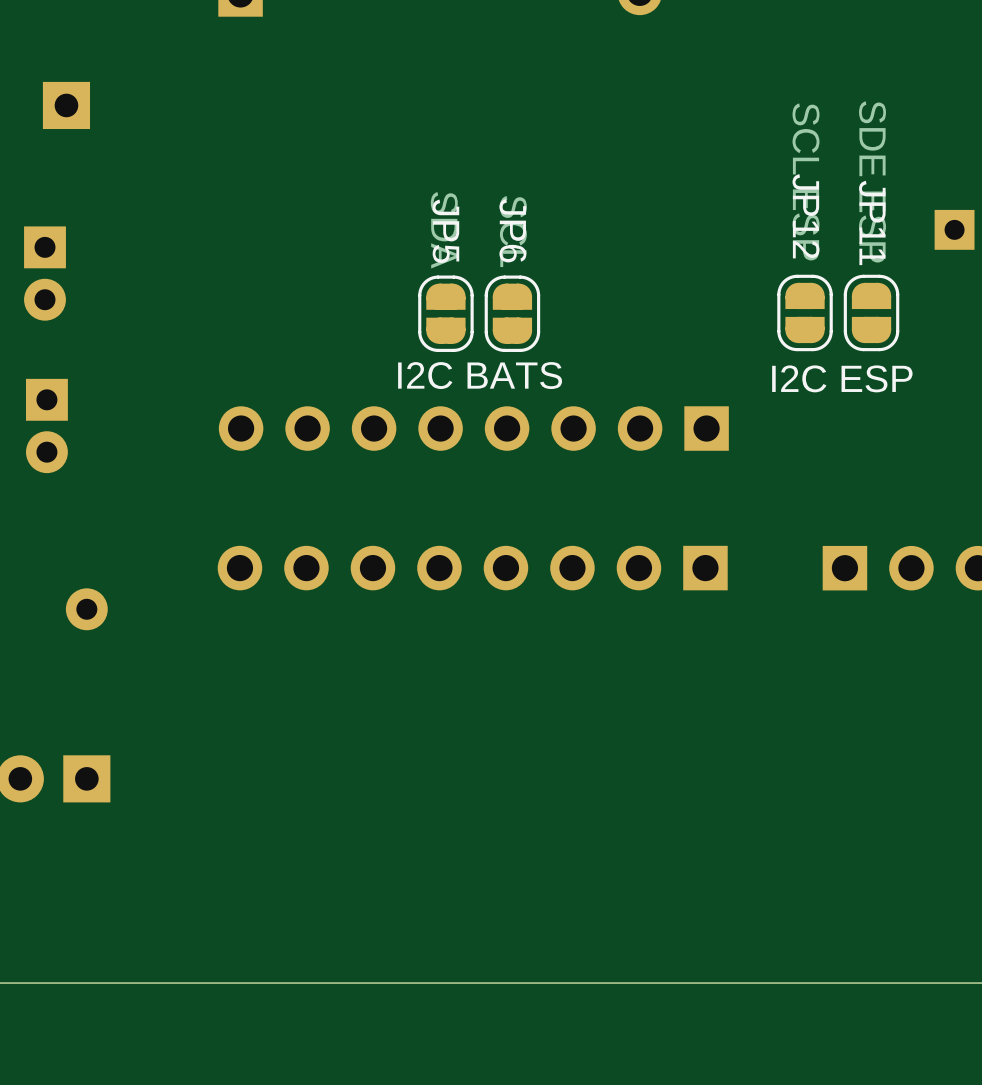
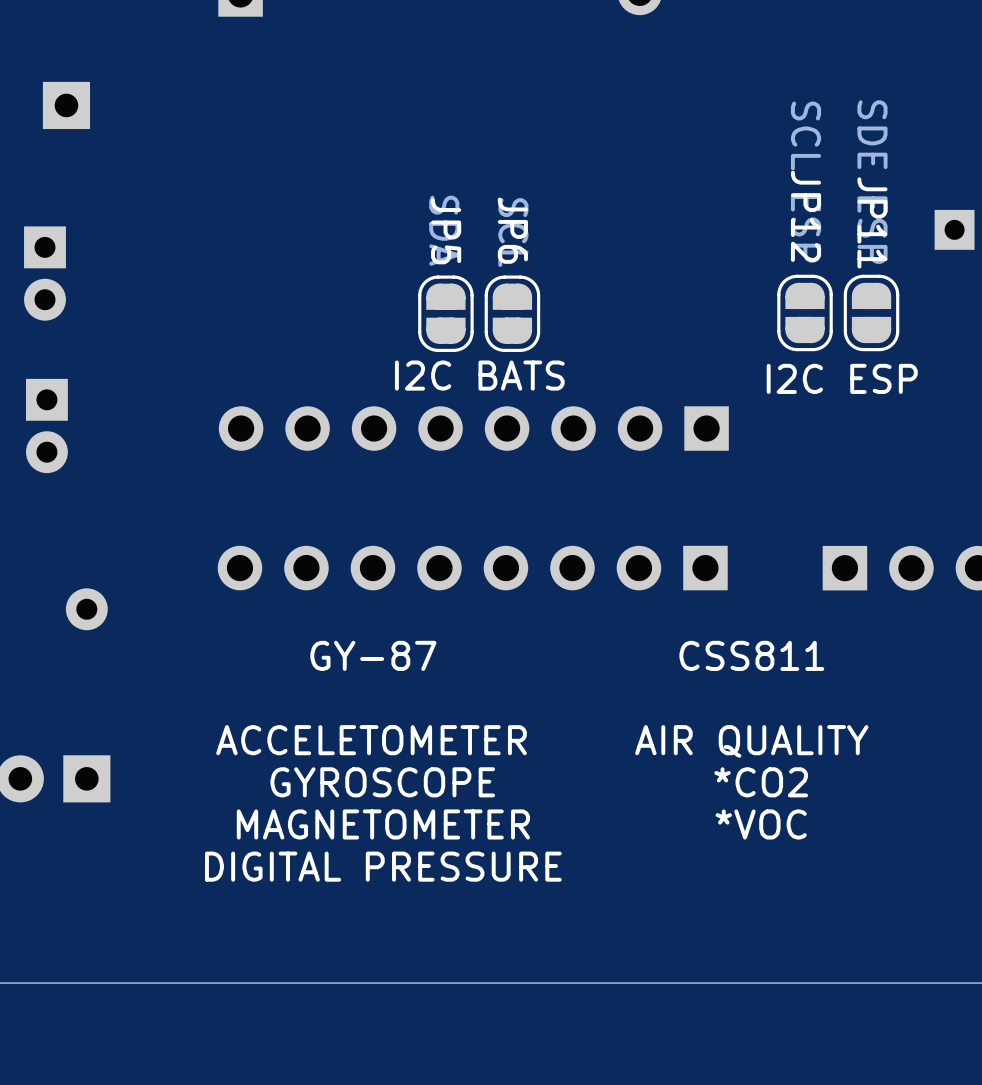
text: none -> GY-87 (373, 655)
text: none -> CSS811 (751, 655)
text: none -> ACCELETOMETER (371, 740)
text: none -> AIR QUALITY (751, 741)
text: none -> GYROSCOPE (382, 782)
text: none -> *CO2 (761, 782)
text: none -> MAGNETOMETER (383, 824)
text: none -> *VOC (761, 824)
text: none -> DIGITAL PRESSURE (383, 866)

